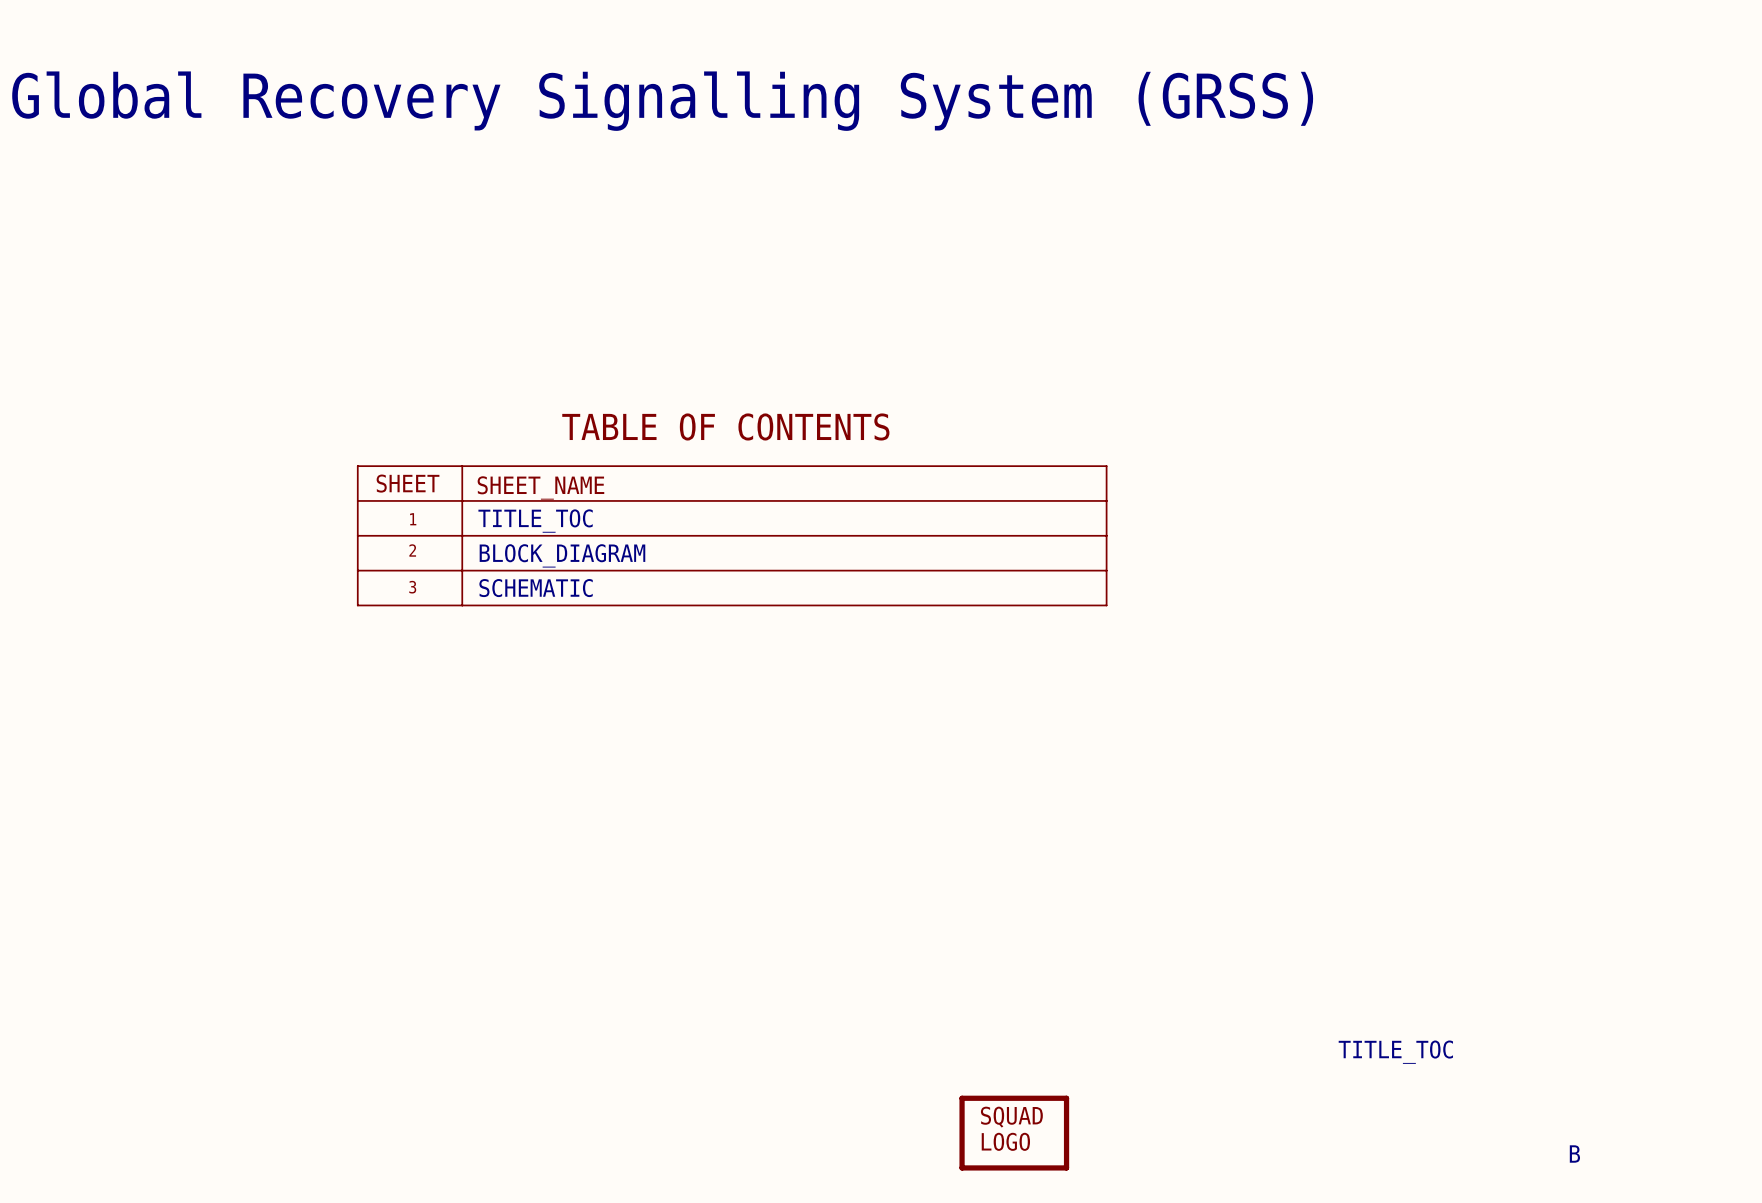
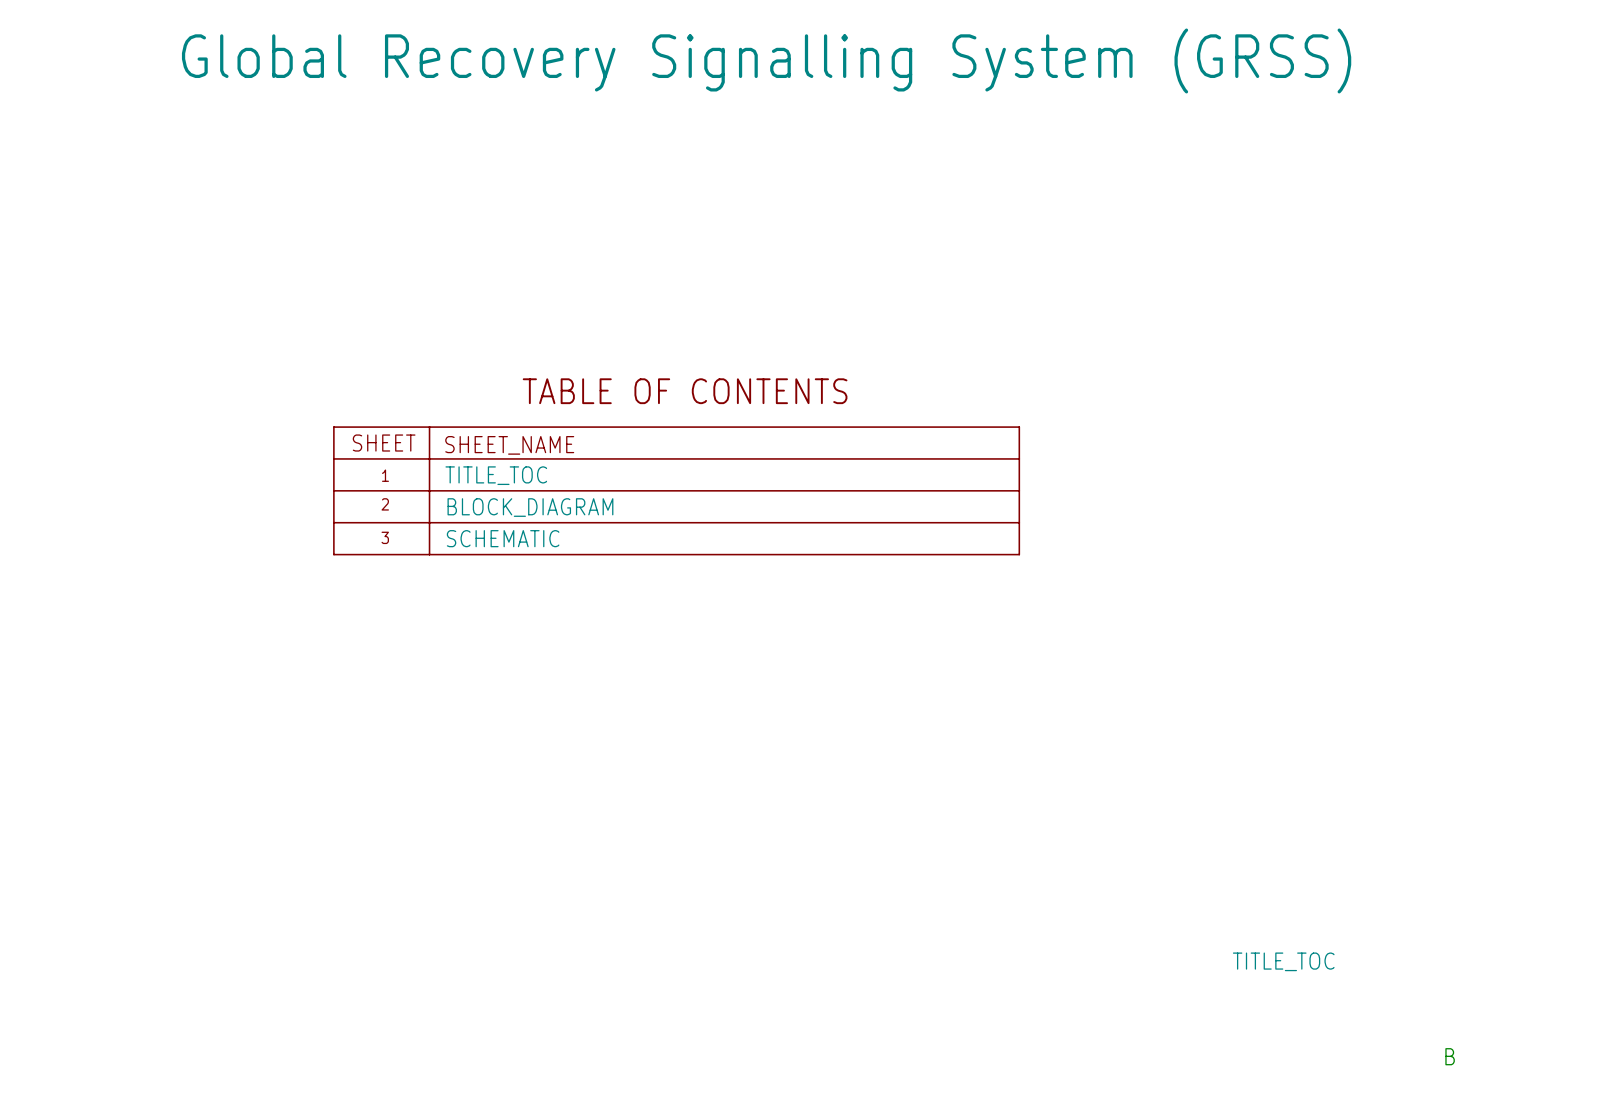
text: none -> Global Recovery Signalling System (GRSS) (766, 60)
text: Global Recovery Signalling System (GRSS) (662, 101) -> none
part: (1014, 1133) -> none

